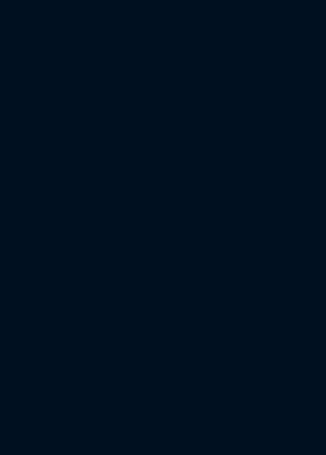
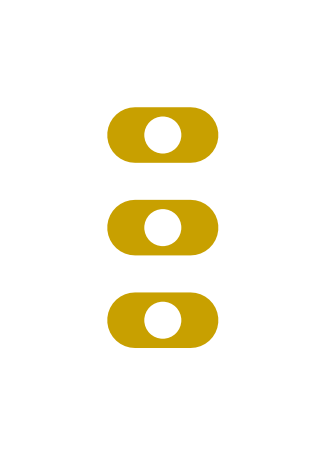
part: none -> (162, 227)

